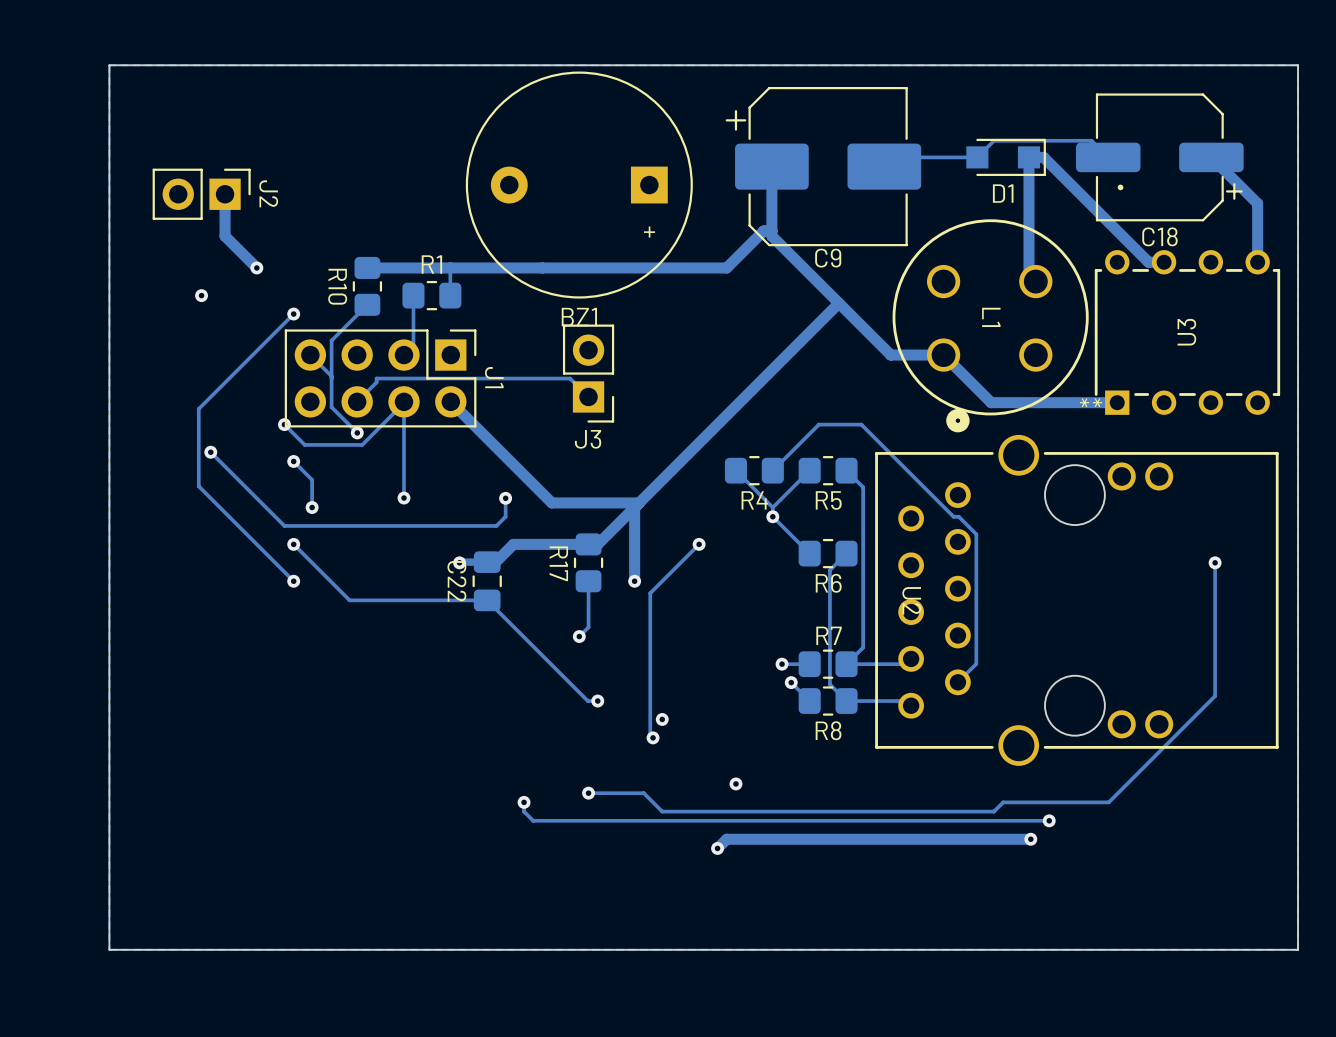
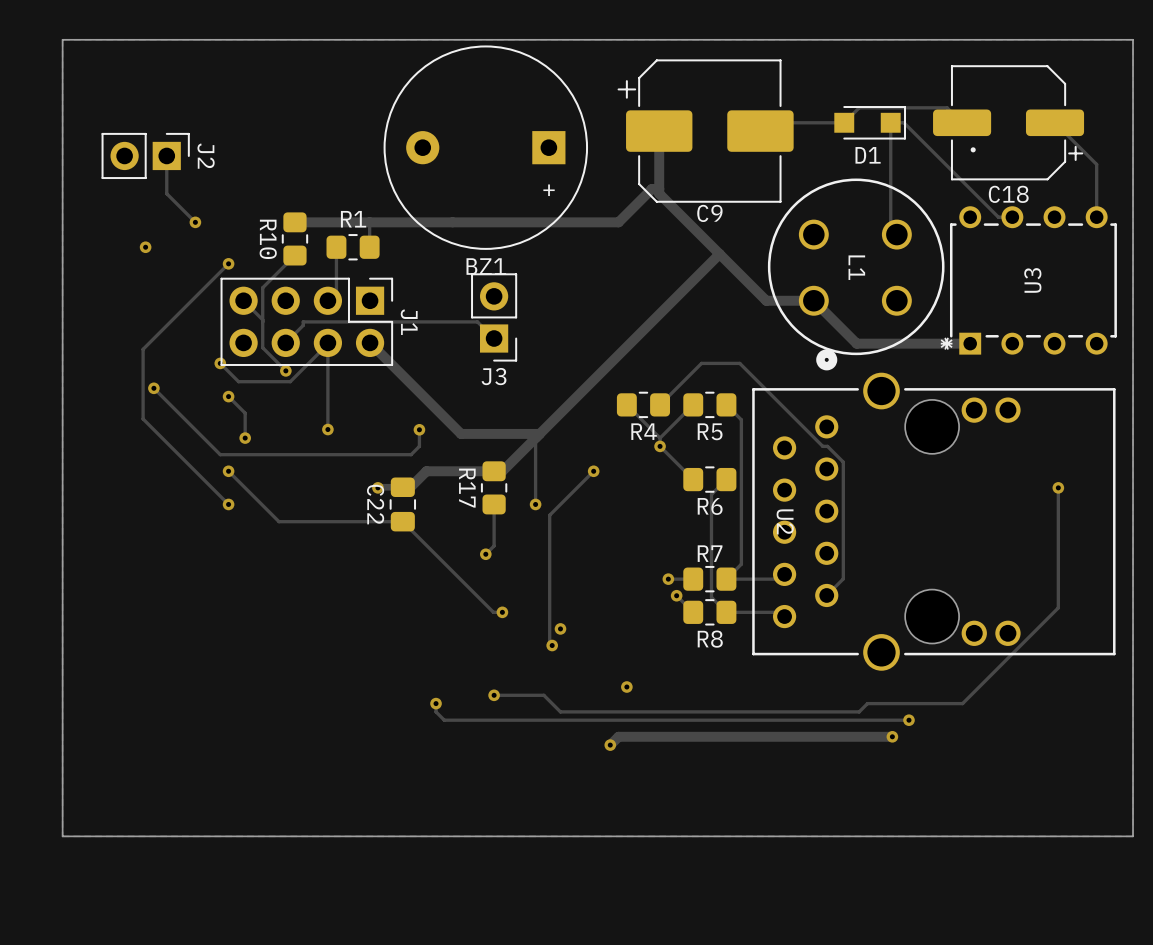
track width: thick (1211, 157) (1257, 203) (1257, 262) -> thin (1055, 122) (1096, 164) (1096, 217)
track width: thick (225, 194) (225, 236) (256, 267) -> thin (166, 155) (166, 193) (195, 222)
track width: thick (1164, 262) (1148, 262) (1043, 157) (1028, 157) (1028, 274) -> thin (1012, 217) (998, 217) (904, 122) (890, 122) (890, 228)
track width: thick (634, 507) (634, 581) -> thin (535, 438) (535, 504)

